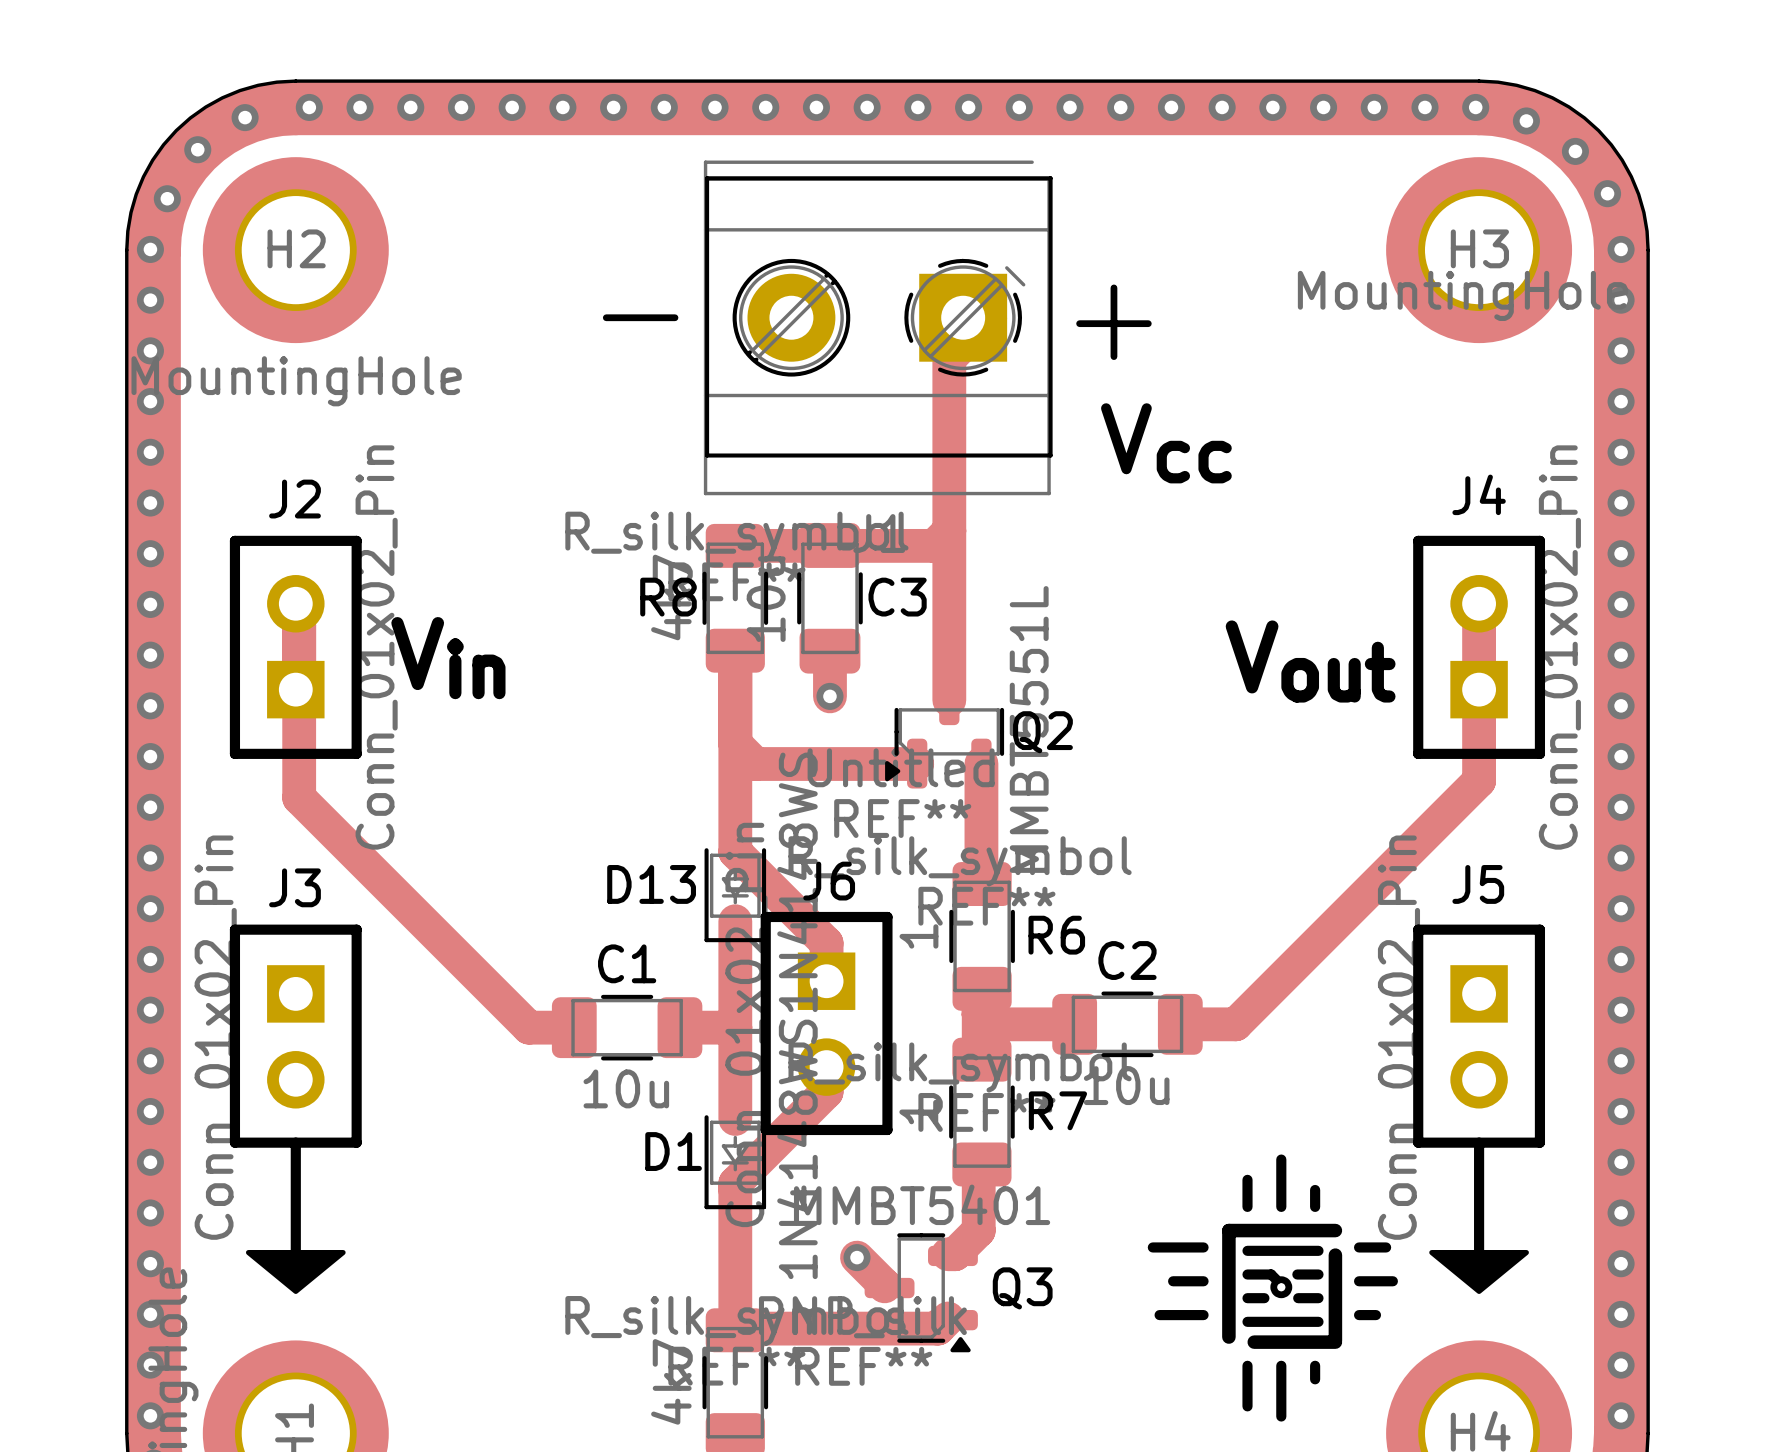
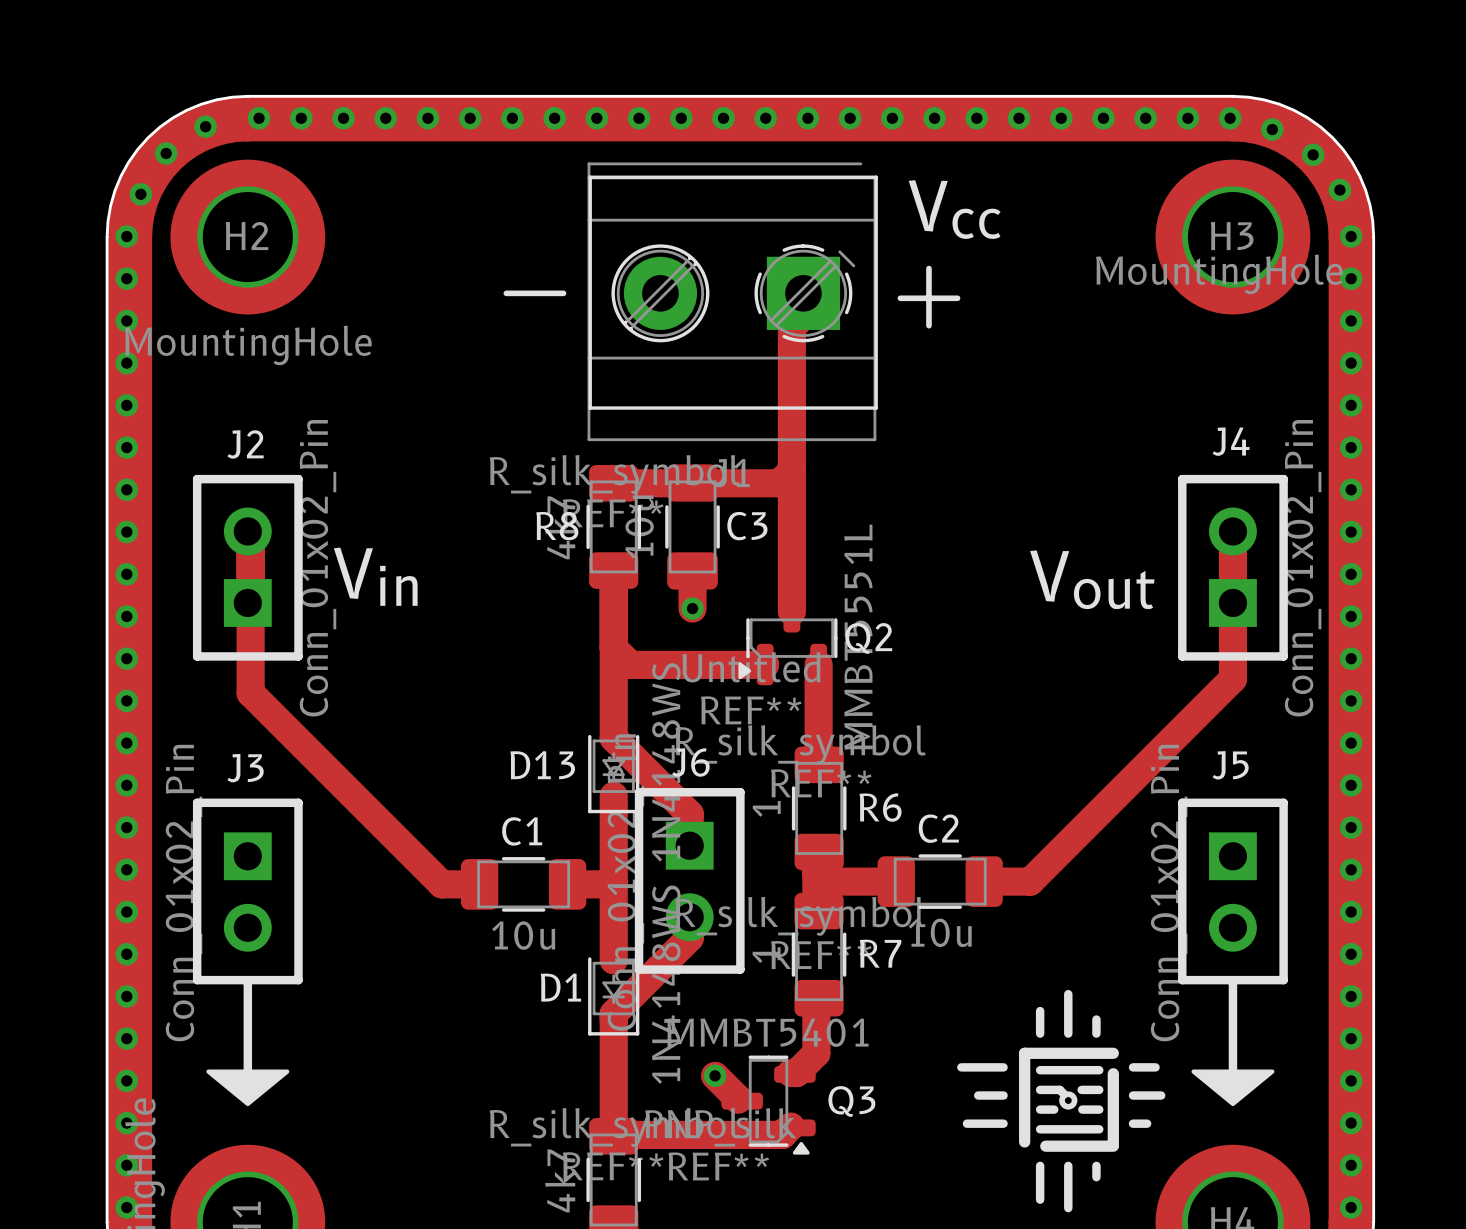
text position: Vcc (1166, 443) -> Vcc (954, 209)

